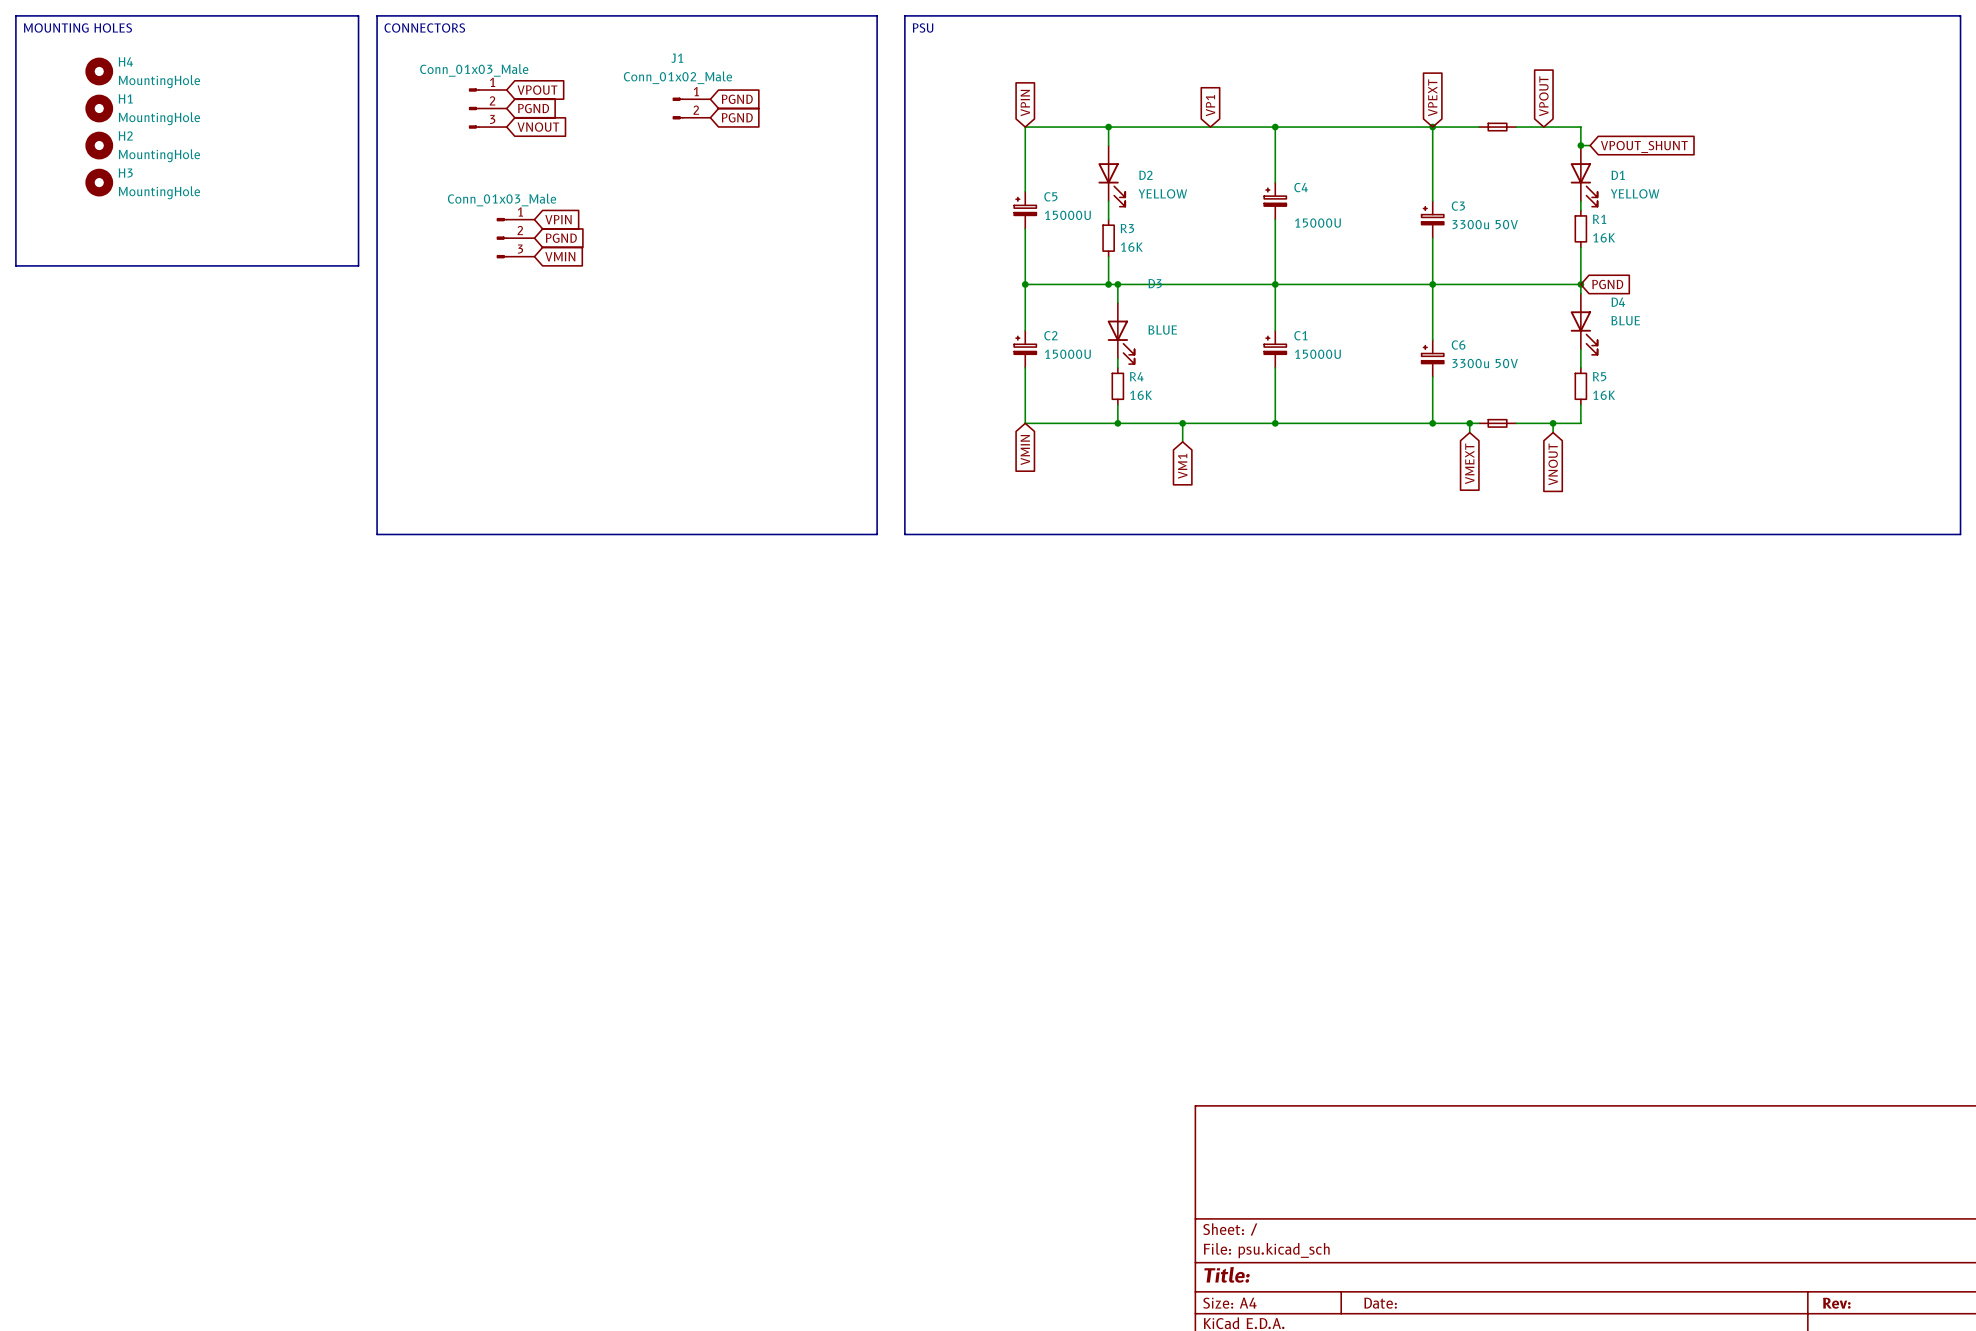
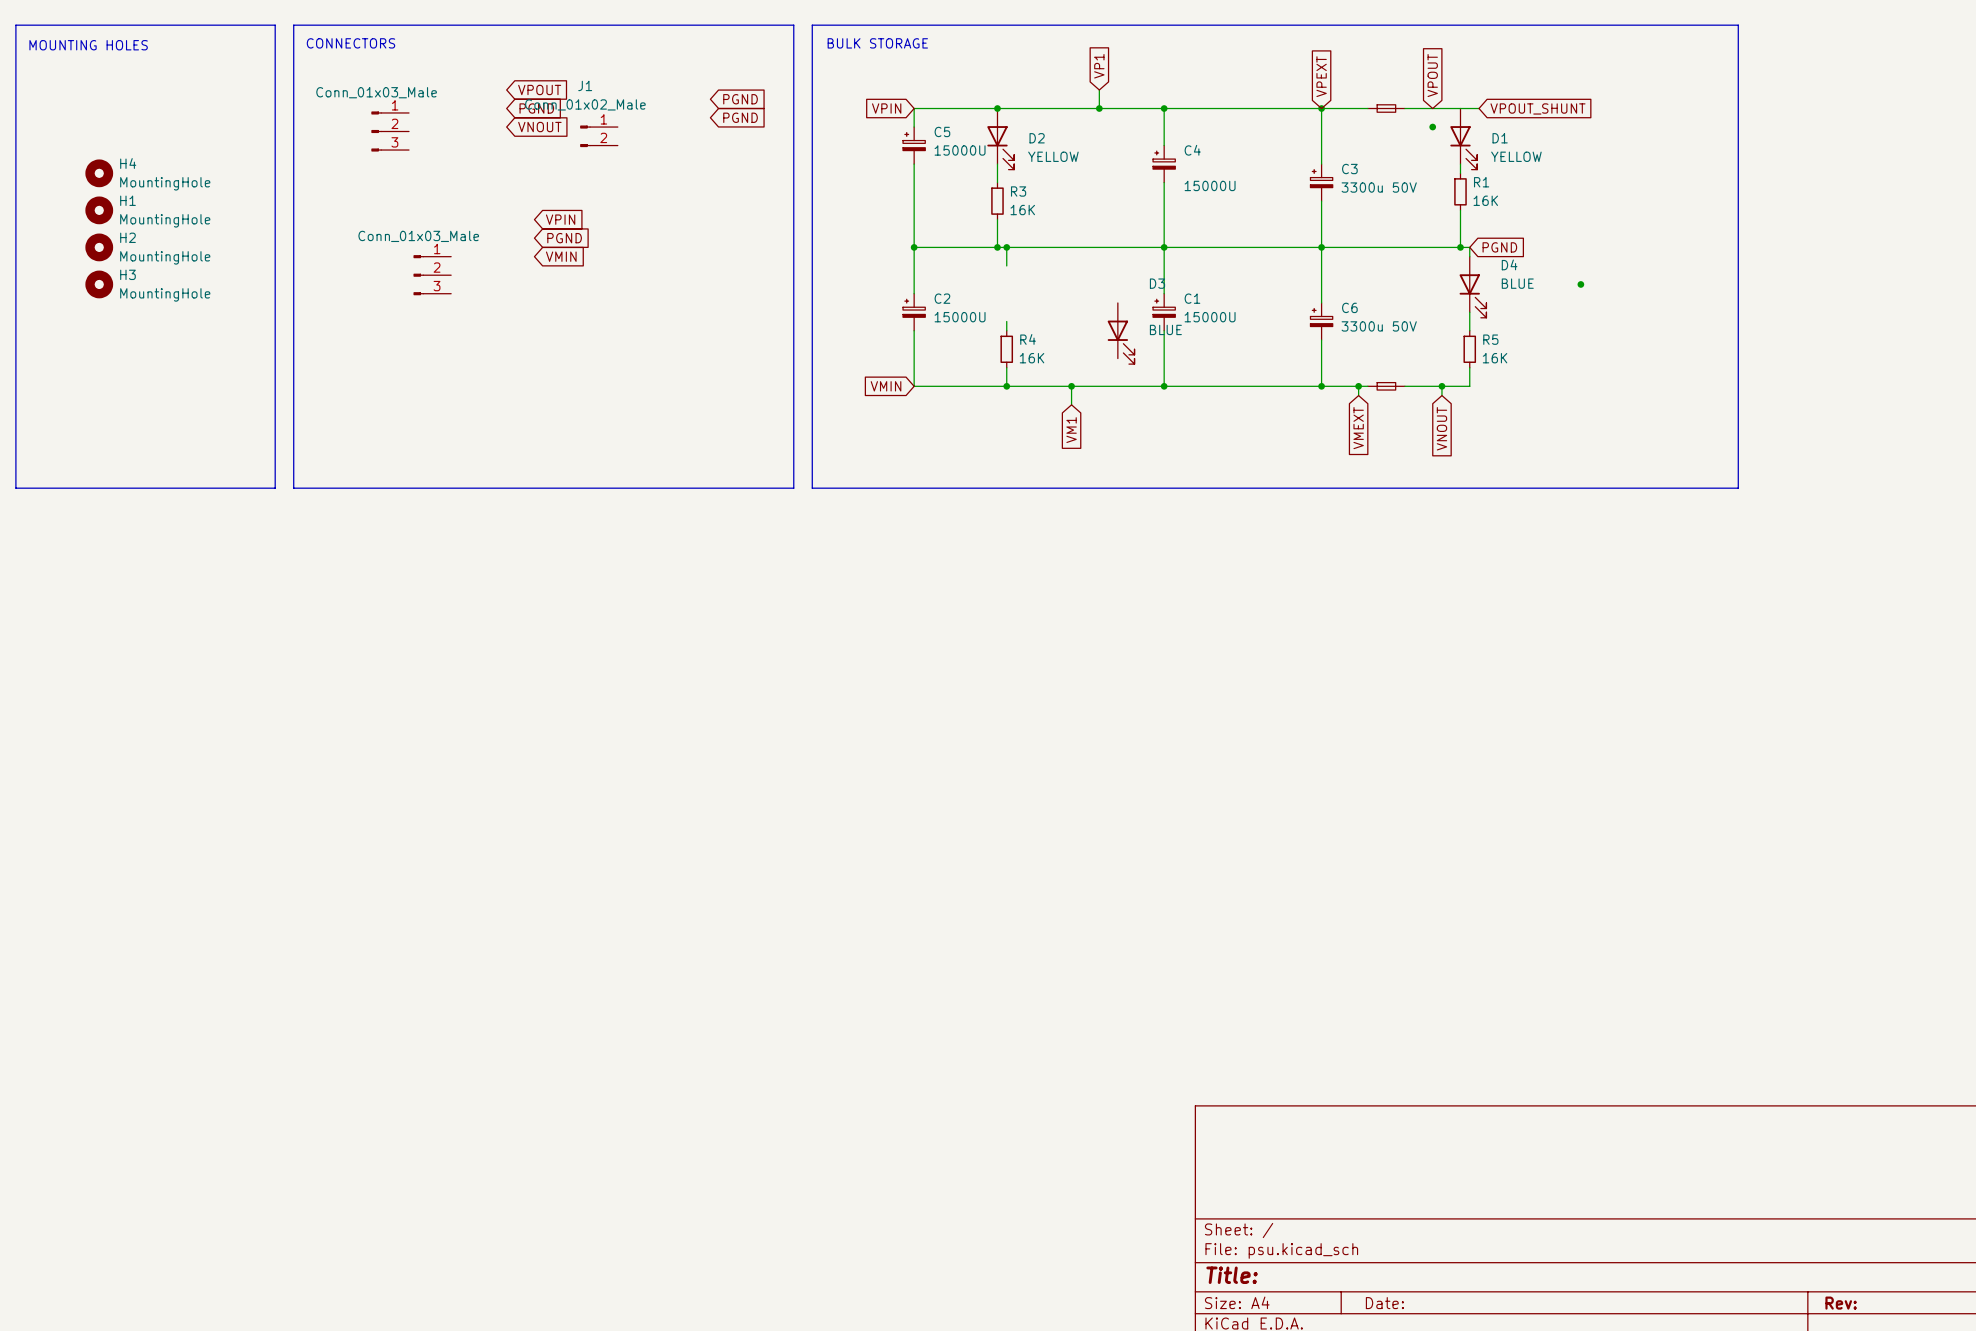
line: (377, 15) (877, 15) (877, 534) (377, 534) (377, 15) -> (293, 25) (293, 488) (793, 488) (793, 25) (293, 25)
line: (904, 15) (1960, 15) (1960, 534) (904, 534) (904, 15) -> (812, 25) (812, 488) (1738, 488) (1738, 25) (812, 25)
line: (15, 25) (15, 15) (358, 15) (358, 265) (15, 265) -> (15, 25) (275, 25) (275, 488) (15, 488) (15, 265)
text position: MOUNTING HOLES (77, 27) -> MOUNTING HOLES (88, 45)
text position: CONNECTORS (424, 27) -> CONNECTORS (350, 43)
text: PSU (923, 27) -> none
text: none -> BULK STORAGE (877, 43)
H4 position: (99, 71) -> (99, 173)
global label position: VPOUT (1543, 96) -> VPOUT (1432, 75)
global label position: VPEXT (1432, 97) -> VPEXT (1321, 76)
global label rotation: 0° (1025, 103) -> 90° counterclockwise (886, 108)
global label position: VPIN (1025, 103) -> VPIN (886, 108)
global label position: VP1 (1210, 105) -> VP1 (1099, 66)
H1 position: (99, 108) -> (99, 210)
part: Conn_01x03_Male (487, 108) -> none
J1 position: (691, 108) -> (599, 136)
junction: none -> (997, 108)
wire: none -> (1164, 108) (1164, 145)
junction: none -> (1164, 108)
junction: none -> (1321, 108)
wire: none -> (1367, 108) (914, 108) (914, 127)
wire: none -> (1404, 108) (1479, 108)
wire: (1108, 127) (1108, 145) -> (1099, 89) (1099, 108)
junction position: (1108, 127) -> (1099, 108)
wire: (1275, 127) (1275, 182) -> (1321, 108) (1321, 164)
junction: (1275, 127) -> none
wire: (1432, 127) (1432, 201) -> none
wire: (1479, 127) (1025, 127) (1025, 191) -> none
part position: (1497, 127) -> (1386, 108)
wire: (1516, 127) (1580, 127) (1580, 145) (1590, 145) -> none
part: none -> Conn_01x03_Male (390, 131)
H2 position: (99, 145) -> (99, 247)
junction: (1580, 145) -> none
global label position: VPOUT_SHUNT (1644, 146) -> VPOUT_SHUNT (1538, 108)
wire: none -> (914, 164) (914, 293)
D2 position: (1111, 176) -> (1000, 139)
D1 position: (1584, 176) -> (1463, 139)
H3 position: (99, 182) -> (99, 284)
wire: (1108, 201) (1108, 219) -> (997, 164) (997, 182)
C4 position: (1275, 201) -> (1164, 164)
wire: (1580, 201) (1580, 210) -> (1460, 164) (1460, 173)
C5 position: (1025, 210) -> (914, 145)
wire: none -> (1460, 210) (1460, 247)
wire: (1275, 219) (1275, 330) -> (1164, 182) (1164, 293)
C3 position: (1432, 219) -> (1321, 182)
wire: (1025, 228) (1025, 330) -> none
R1 position: (1580, 228) -> (1460, 191)
part: Conn_01x03_Male (515, 238) -> none
R3 position: (1108, 238) -> (997, 201)
wire: (1432, 238) (1432, 340) -> (1321, 201) (1321, 302)
wire: none -> (914, 247) (1469, 247) (1469, 256)
junction: none -> (914, 247)
junction: none -> (997, 247)
junction: none -> (1006, 247)
junction: none -> (1164, 247)
junction: none -> (1321, 247)
junction: none -> (1460, 247)
wire: (1580, 247) (1580, 293) -> none
wire: (1108, 256) (1108, 284) -> (997, 219) (997, 247)
part: none -> Conn_01x03_Male (432, 275)
wire: (1025, 284) (1580, 284) -> none
junction: (1025, 284) -> none
junction: (1108, 284) -> none
wire: (1117, 284) (1117, 302) -> (1006, 247) (1006, 265)
junction: (1117, 284) -> none
junction: (1275, 284) -> none
junction: (1432, 284) -> none
global label position: PGND (1607, 284) -> PGND (1499, 247)
D4 position: (1584, 324) -> (1472, 287)
C2 position: (1025, 349) -> (914, 312)
C1 position: (1275, 349) -> (1164, 312)
wire: (1580, 349) (1580, 367) -> (1469, 312) (1469, 330)
wire: (1117, 358) (1117, 367) -> (1006, 321) (1006, 330)
C6 position: (1432, 358) -> (1321, 321)
wire: (1025, 367) (1025, 423) (1479, 423) -> (914, 330) (914, 386) (1367, 386)
wire: (1275, 367) (1275, 423) -> (1164, 330) (1164, 386)
wire: (1432, 377) (1432, 423) -> (1321, 340) (1321, 386)
junction: none -> (1006, 386)
junction: none -> (1071, 386)
R4 position: (1117, 386) -> (1006, 349)
junction: none -> (1164, 386)
junction: none -> (1321, 386)
junction: none -> (1358, 386)
junction: none -> (1441, 386)
R5 position: (1580, 386) -> (1469, 349)
wire: (1117, 404) (1117, 423) -> (1006, 367) (1006, 386)
wire: (1580, 404) (1580, 423) (1516, 423) -> (1469, 367) (1469, 386) (1404, 386)
junction: (1117, 423) -> none
wire: (1182, 423) (1182, 441) -> (1071, 386) (1071, 404)
junction: (1182, 423) -> none
junction: (1275, 423) -> none
junction: (1432, 423) -> none
wire: (1469, 423) (1469, 432) -> (1358, 386) (1358, 395)
junction: (1469, 423) -> none
part position: (1497, 423) -> (1386, 386)
wire: (1553, 423) (1553, 432) -> (1441, 386) (1441, 395)
junction: (1553, 423) -> none
global label rotation: 0° (1025, 450) -> 90° clockwise (886, 386)
global label position: VMIN (1025, 450) -> VMIN (886, 386)
global label position: VMEXT (1469, 463) -> VMEXT (1358, 428)
global label position: VNOUT (1553, 464) -> VNOUT (1441, 428)
global label position: VM1 (1182, 466) -> VM1 (1071, 430)

